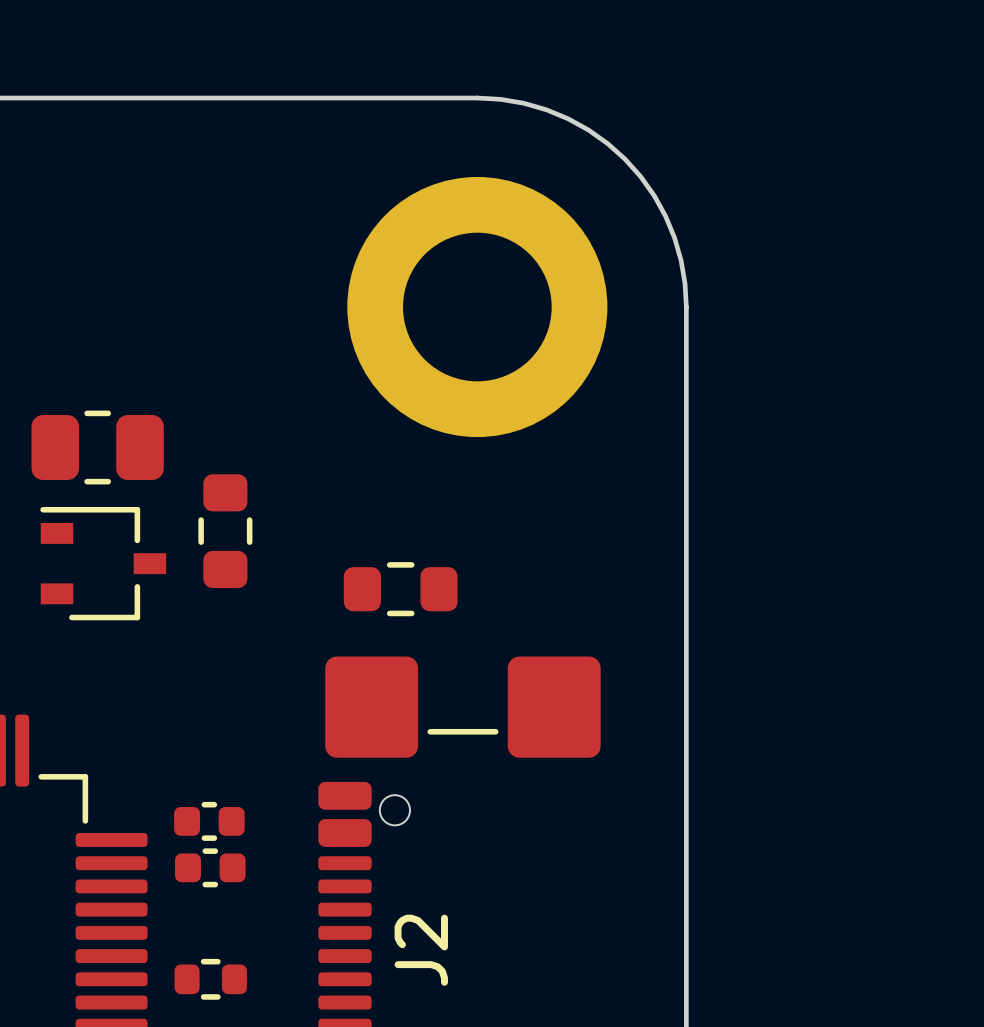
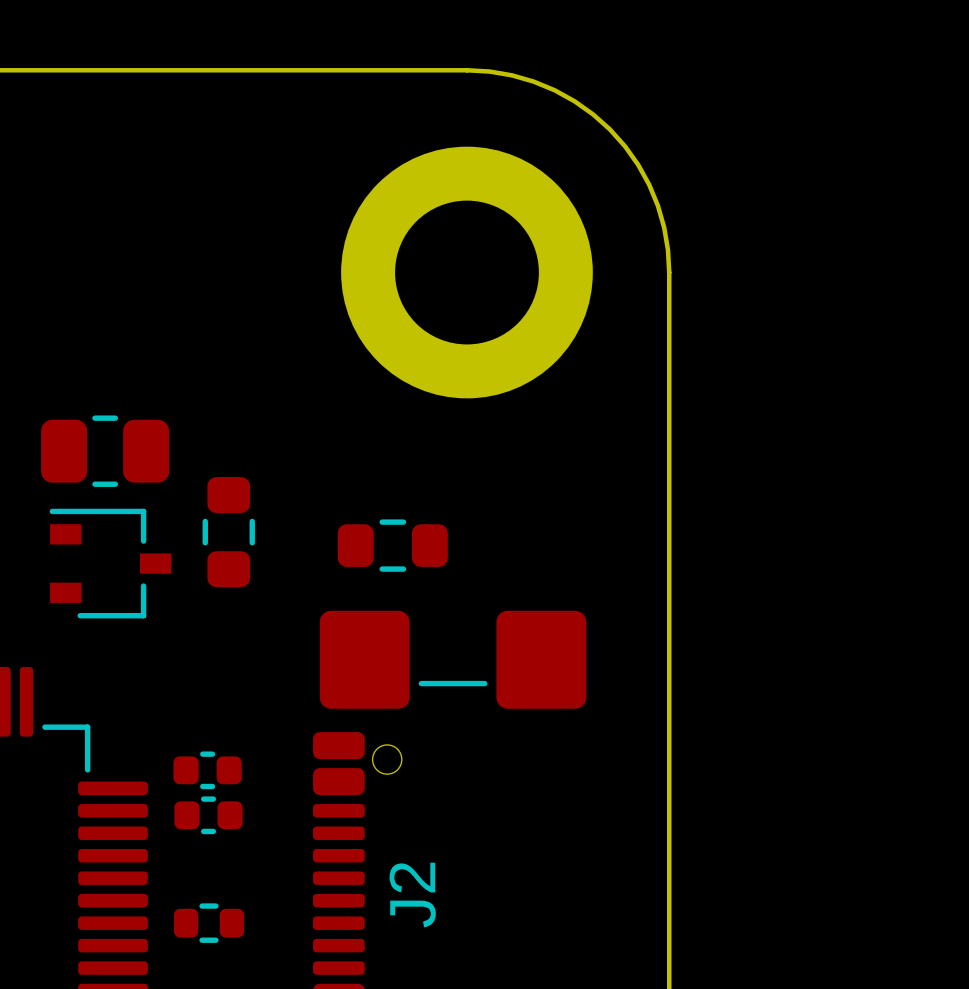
part position: (97, 447) -> (105, 451)
part position: (225, 531) -> (228, 532)
part position: (103, 563) -> (110, 563)

